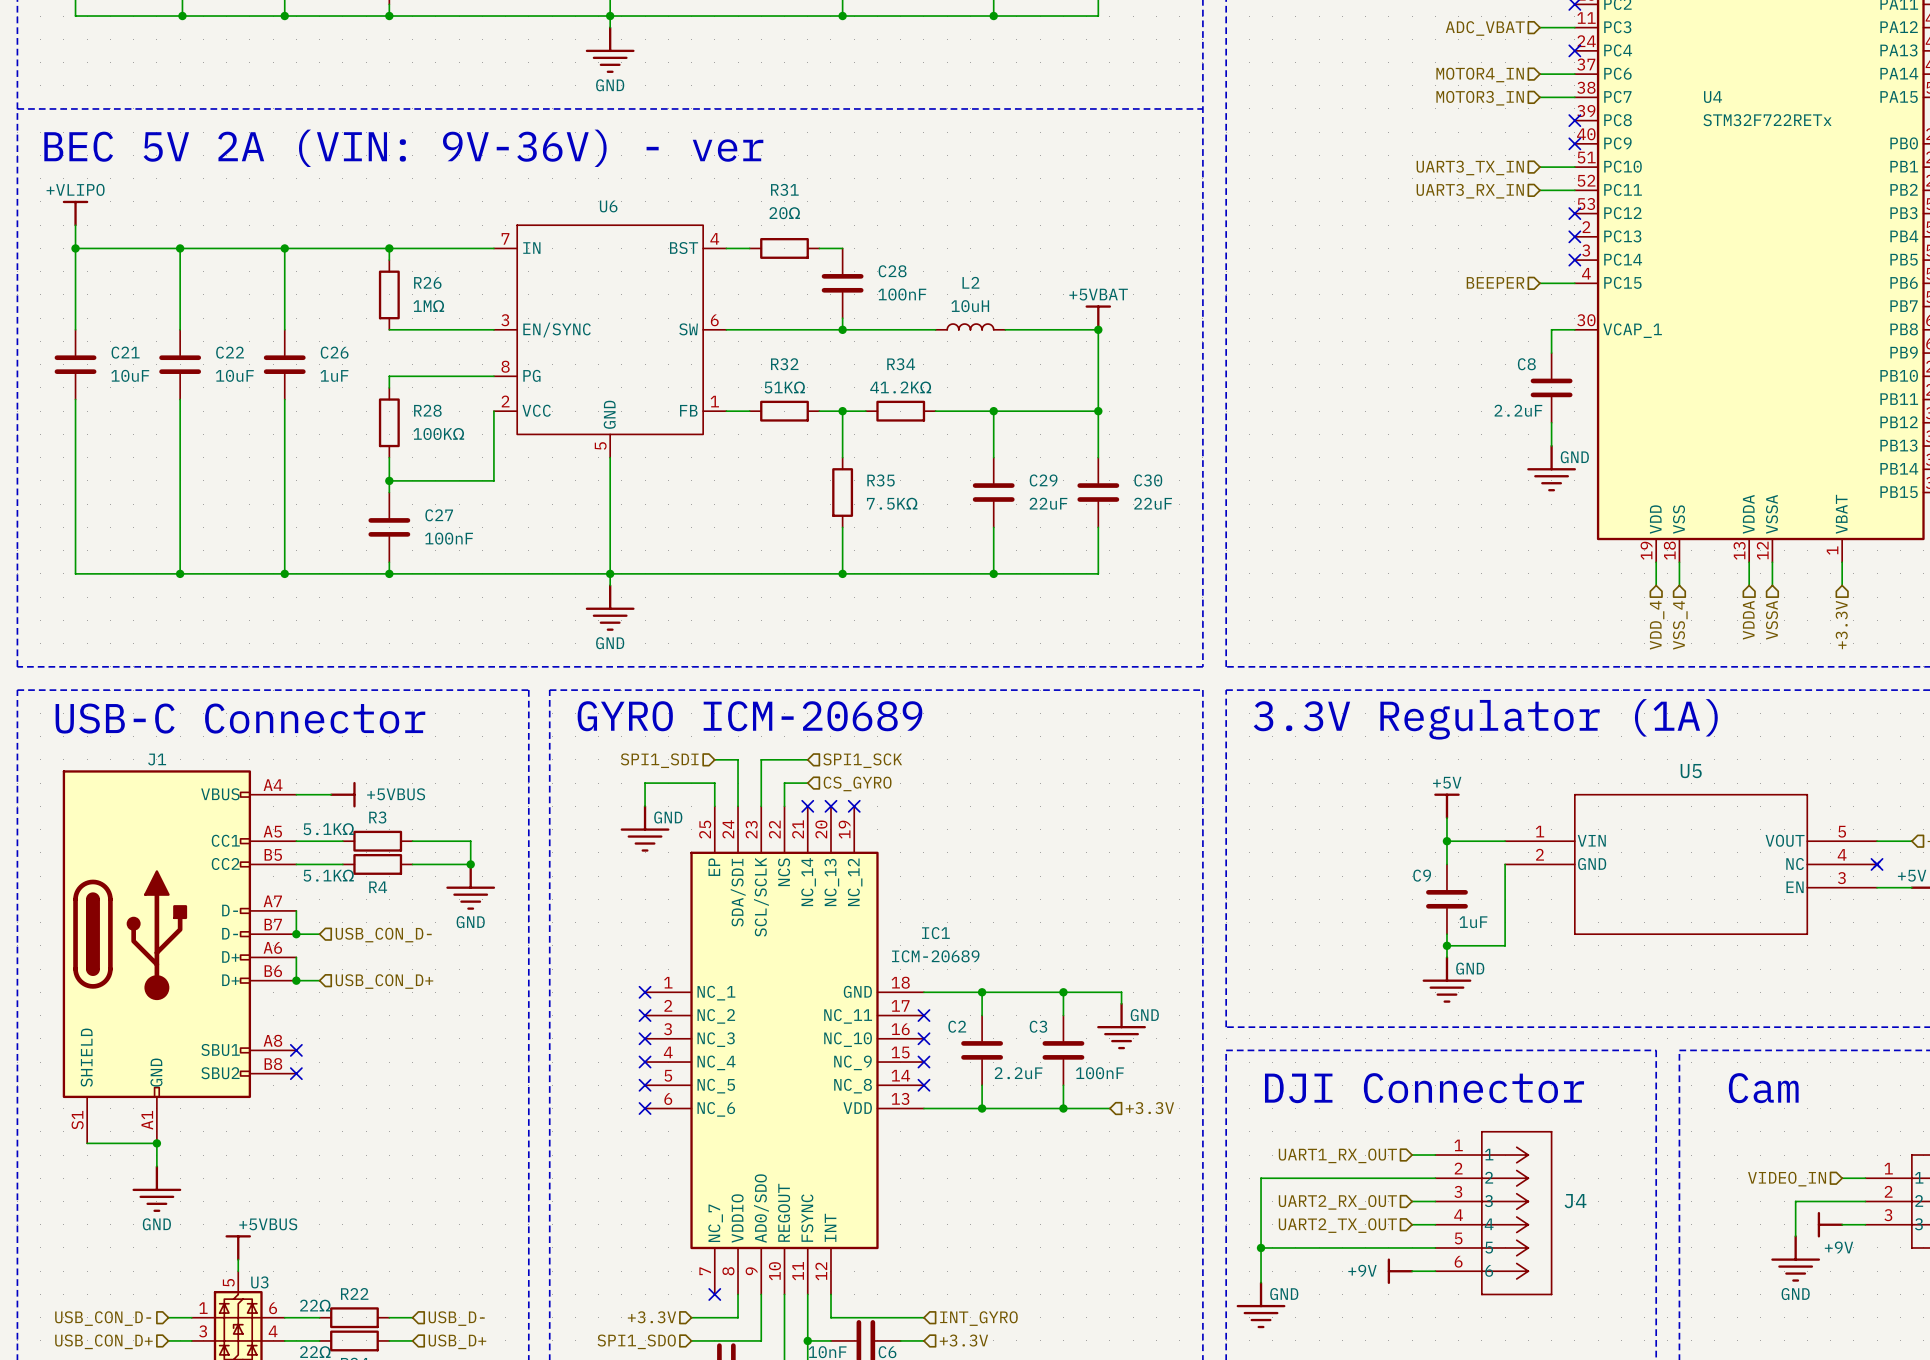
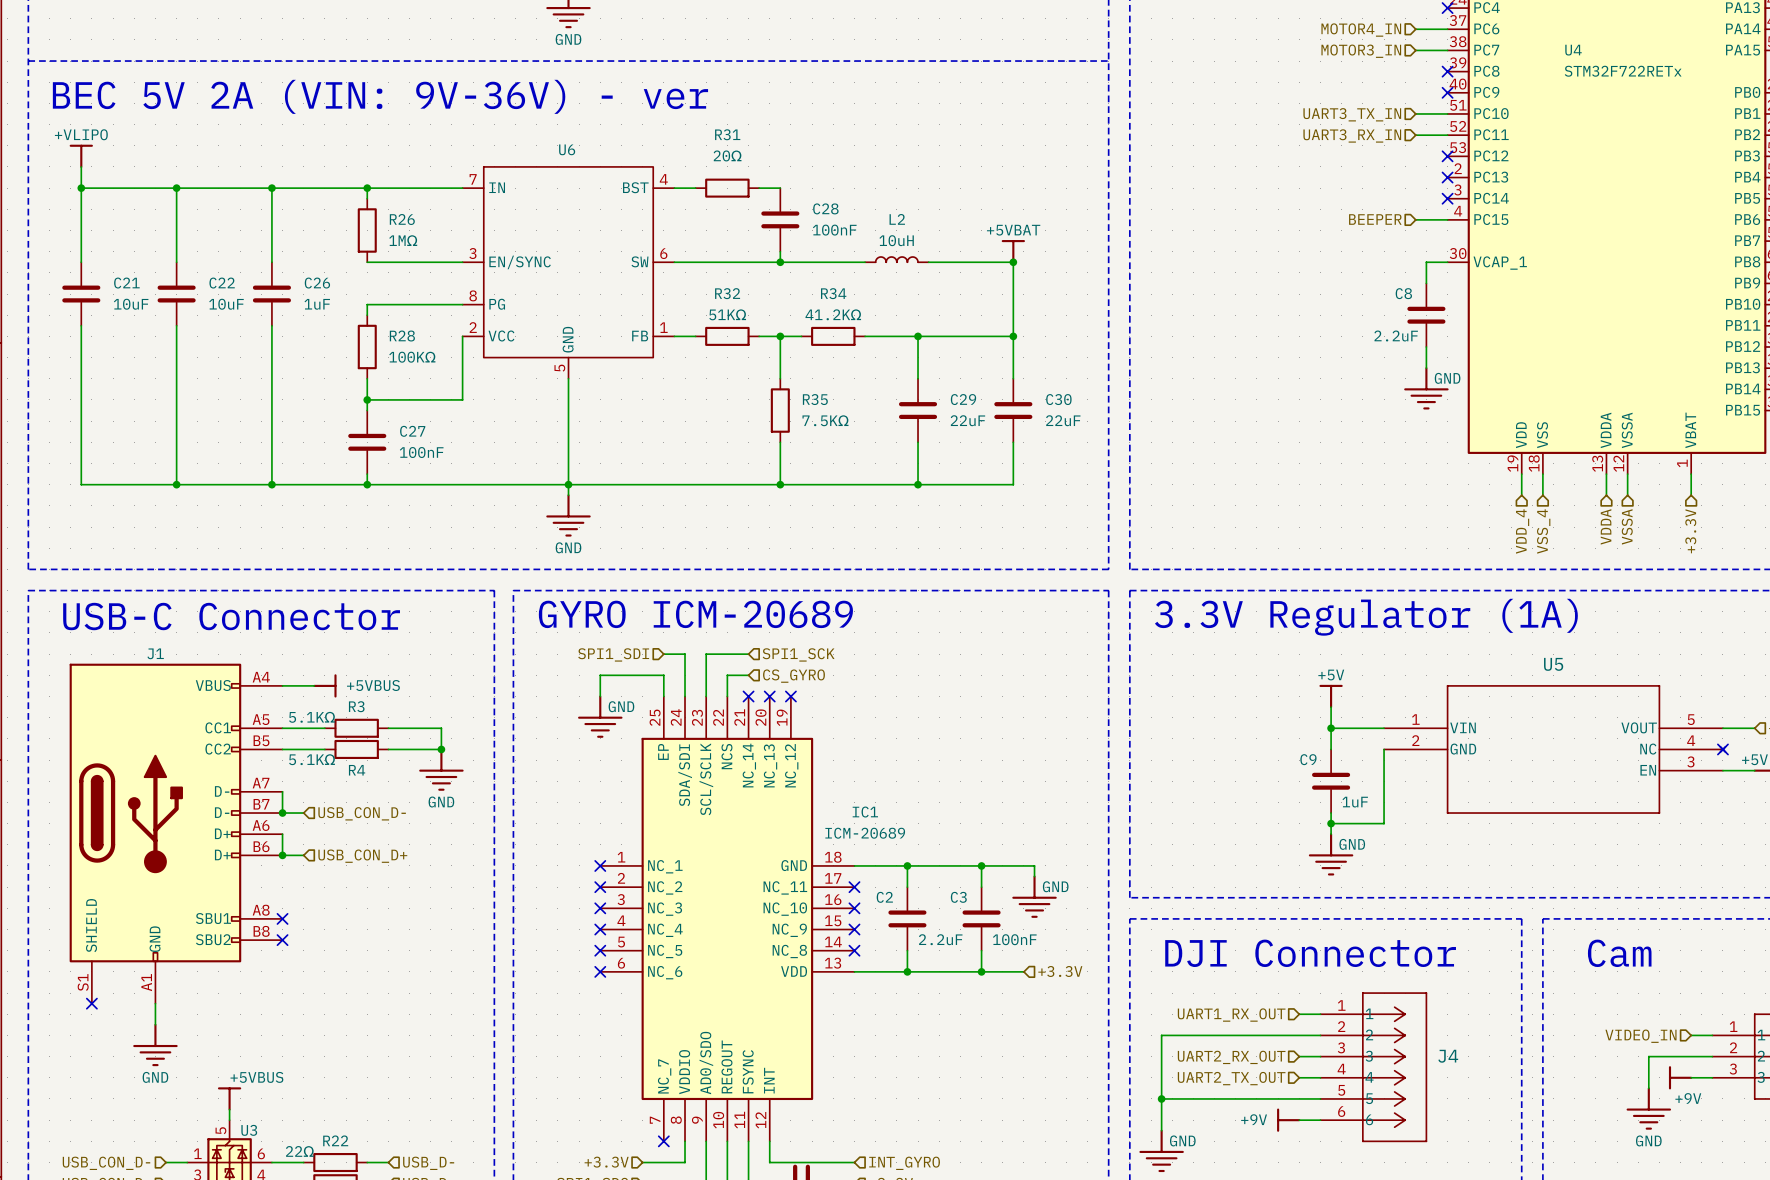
wire: (87, 1143) (156, 1143) -> none
no-connect mark: none -> (91, 1003)
junction: (156, 1143) -> none

